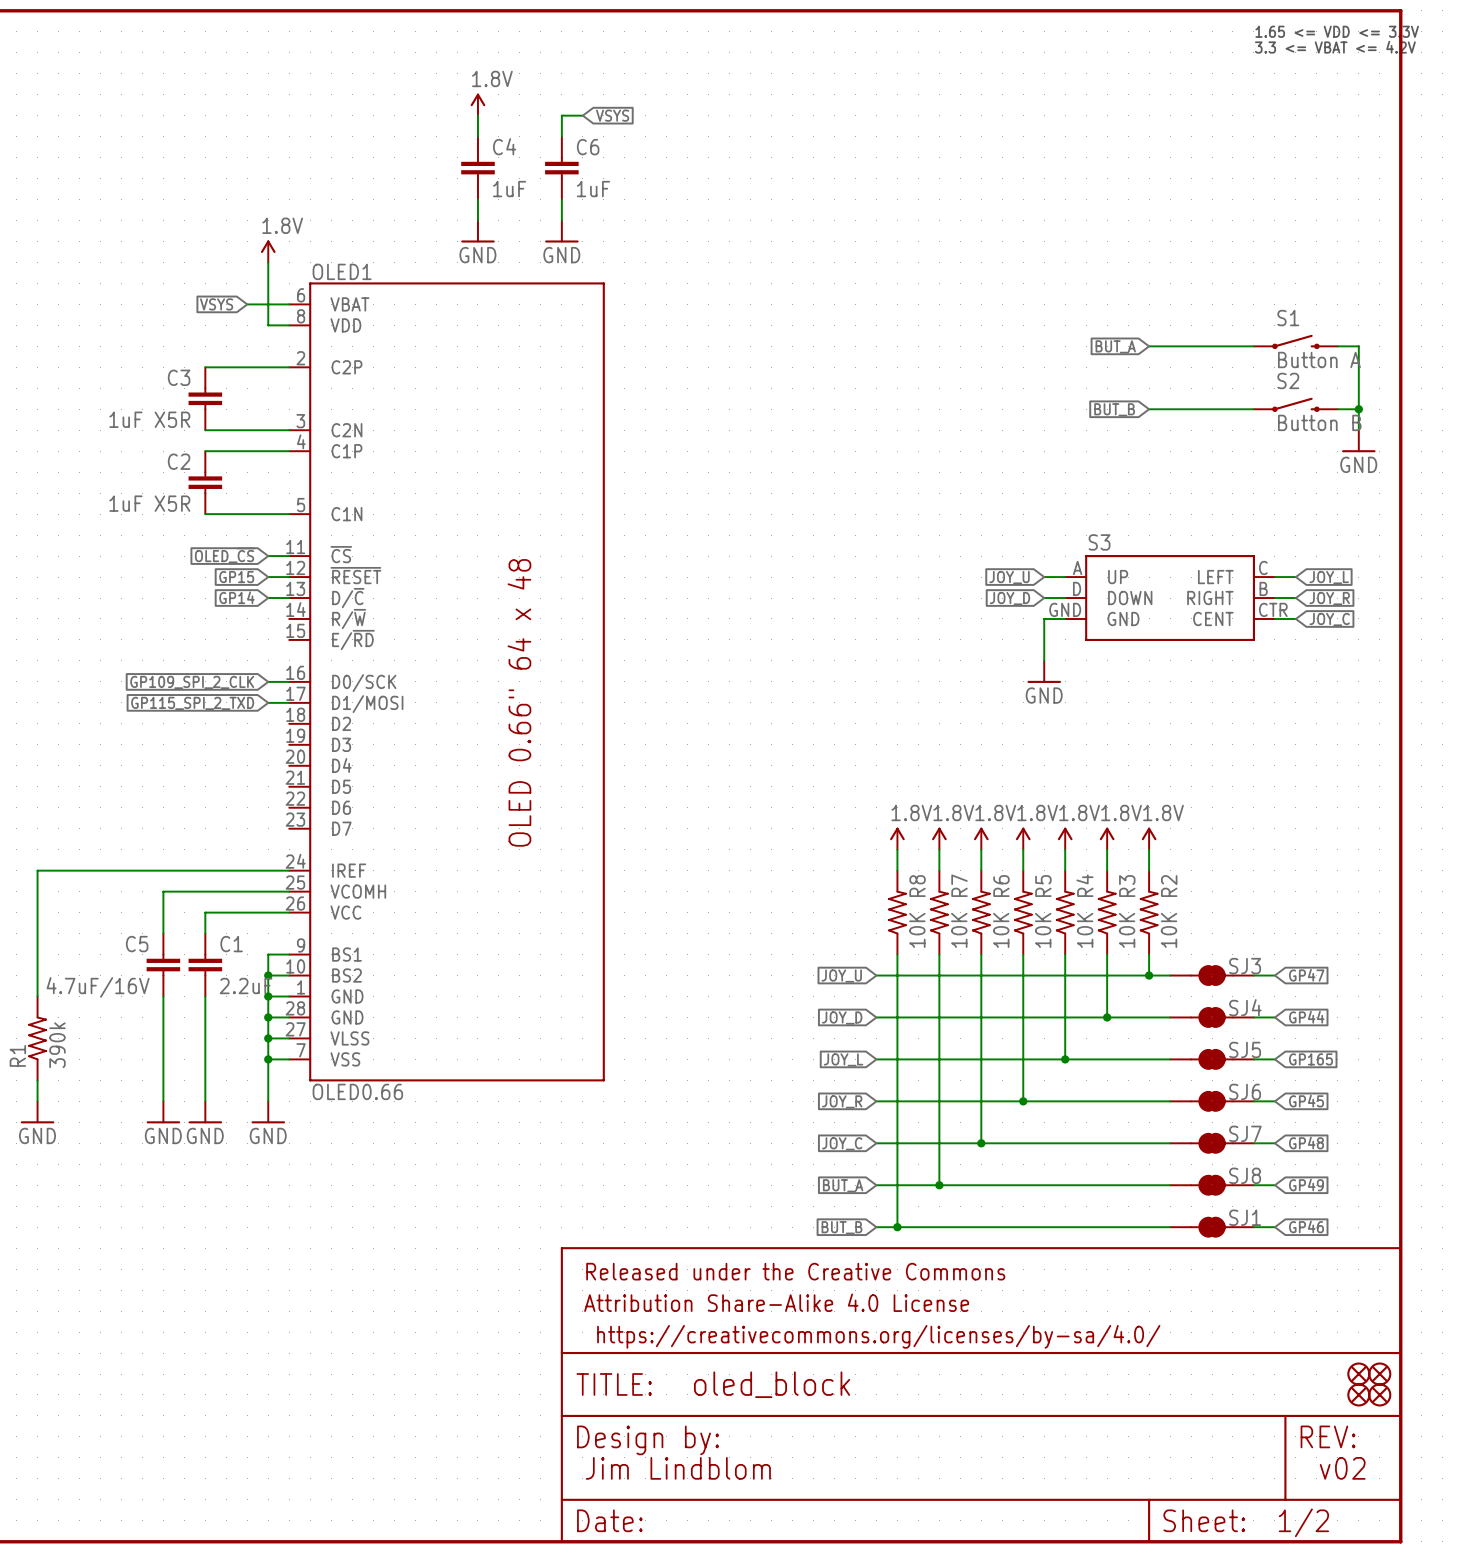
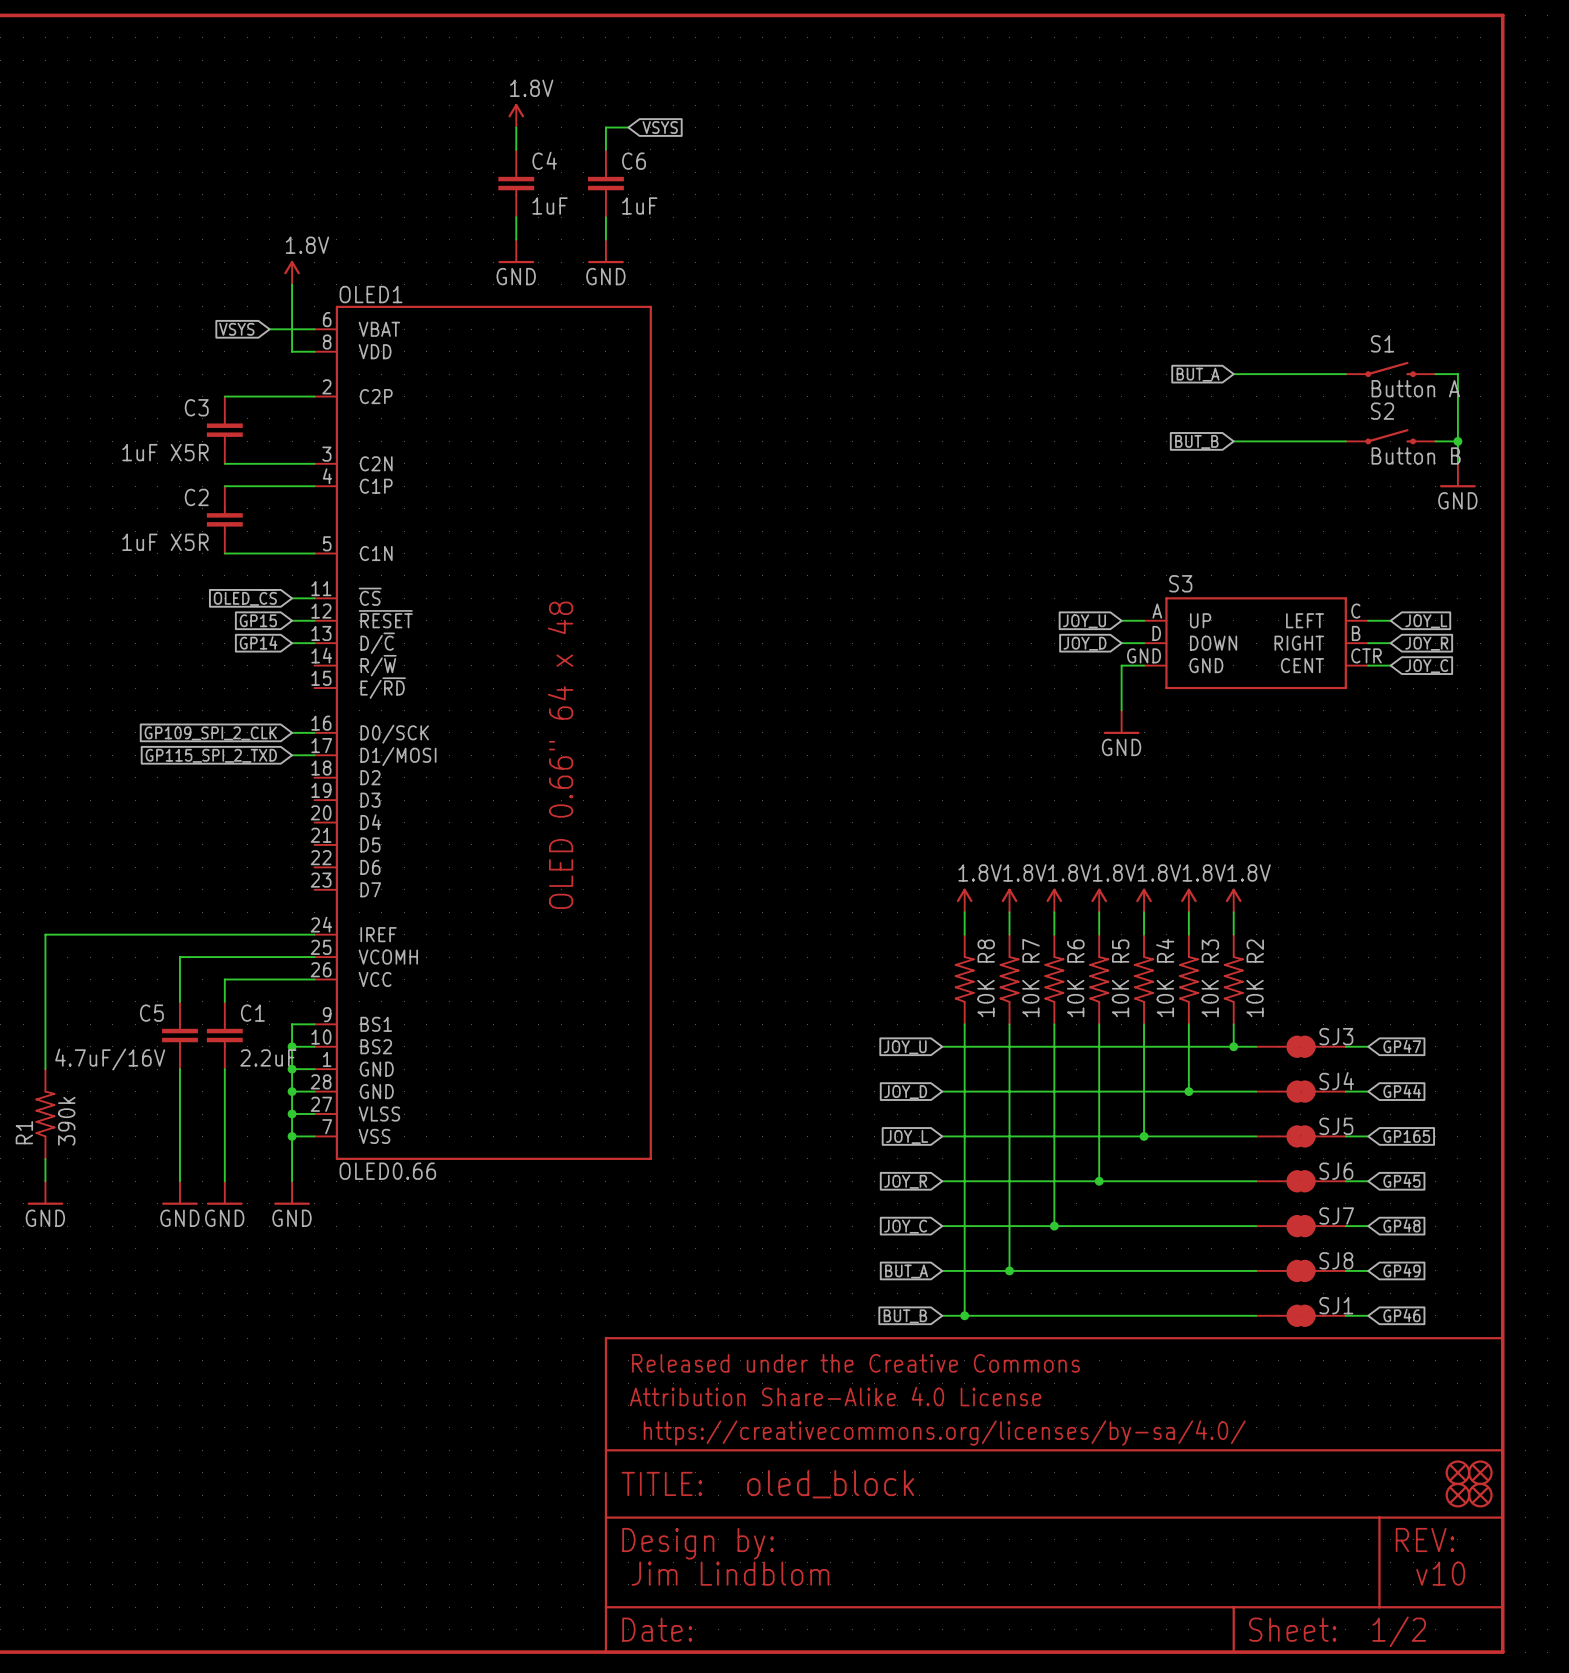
text: 1.65 <= VDD <= 3.3V (1337, 31) -> none
text: 3.3 <= VBAT <= 4.2V (1335, 47) -> none
text: v02 (1342, 1468) -> v10 (1440, 1573)

